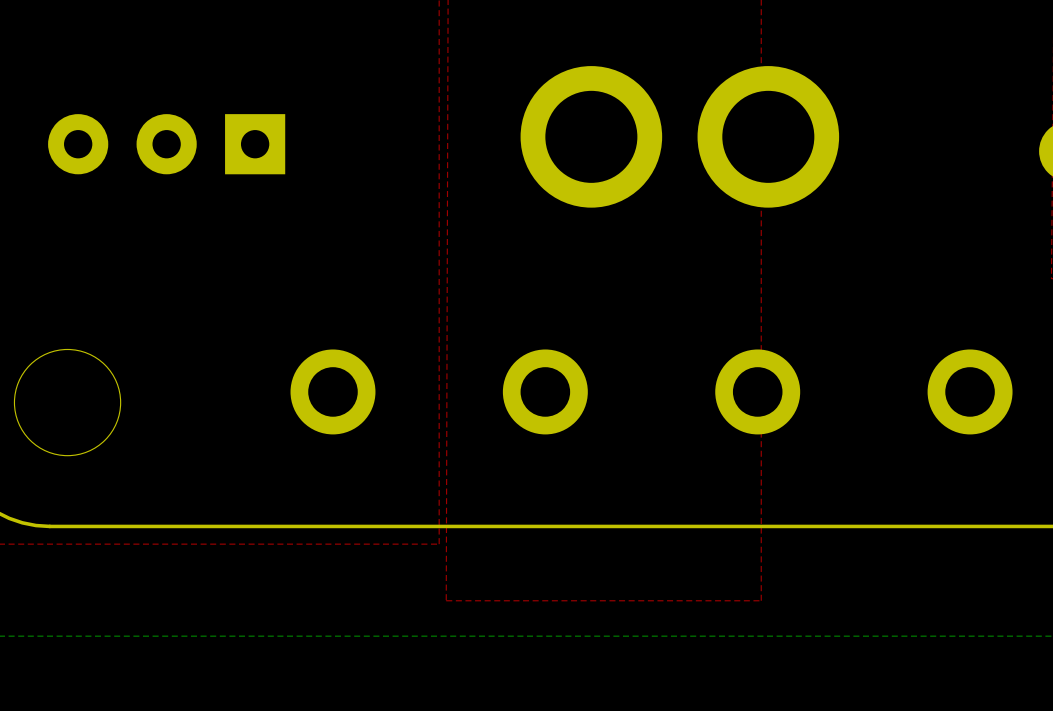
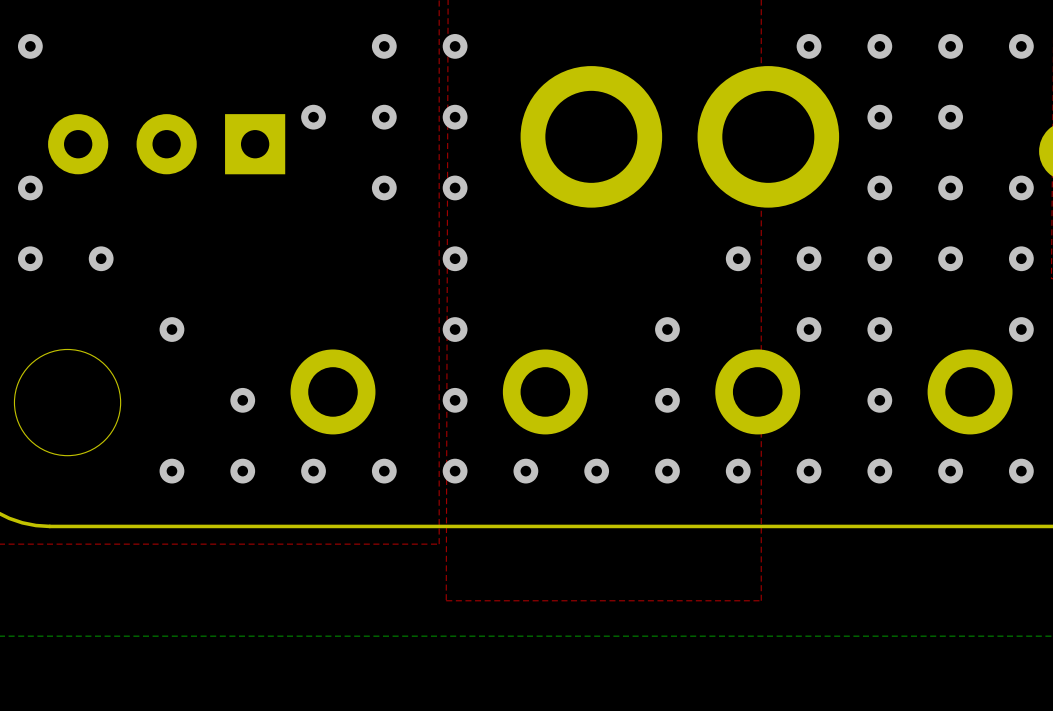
via: none -> (30, 46)
via: none -> (384, 46)
via: none -> (455, 46)
via: none -> (809, 46)
via: none -> (879, 46)
via: none -> (950, 46)
via: none -> (1021, 46)
via: none -> (313, 117)
via: none -> (384, 117)
via: none -> (455, 117)
via: none -> (879, 117)
via: none -> (950, 117)
via: none -> (30, 187)
via: none -> (384, 187)
via: none -> (455, 187)
via: none -> (879, 187)
via: none -> (950, 187)
via: none -> (1021, 187)
via: none -> (30, 258)
via: none -> (101, 258)
via: none -> (455, 258)
via: none -> (738, 258)
via: none -> (809, 258)
via: none -> (879, 258)
via: none -> (950, 258)
via: none -> (1021, 258)
via: none -> (171, 329)
via: none -> (455, 329)
via: none -> (667, 329)
via: none -> (809, 329)
via: none -> (879, 329)
via: none -> (1021, 329)
via: none -> (242, 400)
via: none -> (455, 400)
via: none -> (667, 400)
via: none -> (879, 400)
via: none -> (171, 471)
via: none -> (242, 471)
via: none -> (313, 471)
via: none -> (384, 471)
via: none -> (455, 471)
via: none -> (525, 471)
via: none -> (596, 471)
via: none -> (667, 471)
via: none -> (738, 471)
via: none -> (809, 471)
via: none -> (879, 471)
via: none -> (950, 471)
via: none -> (1021, 471)

